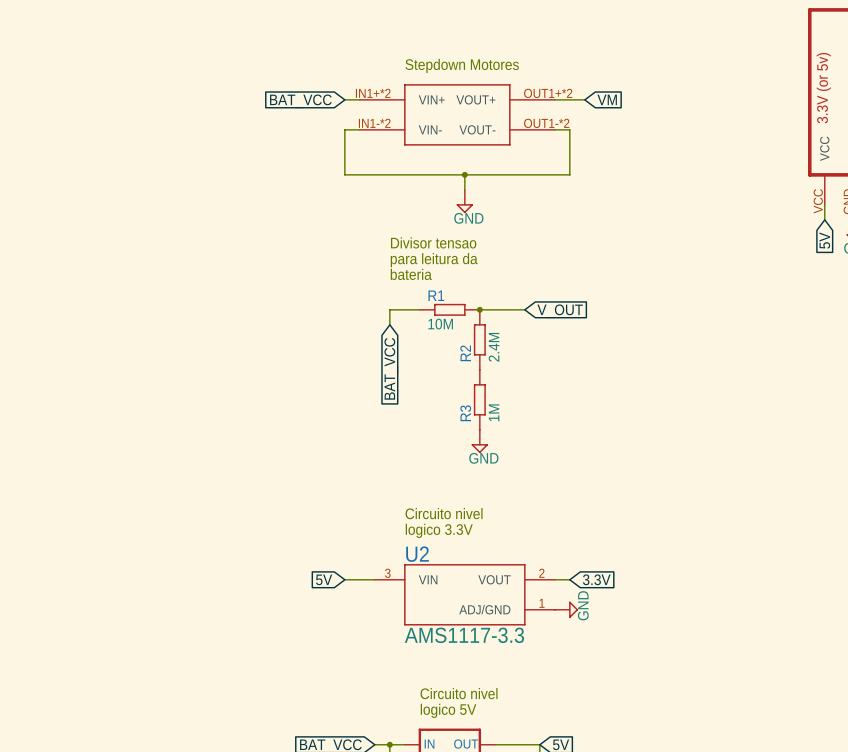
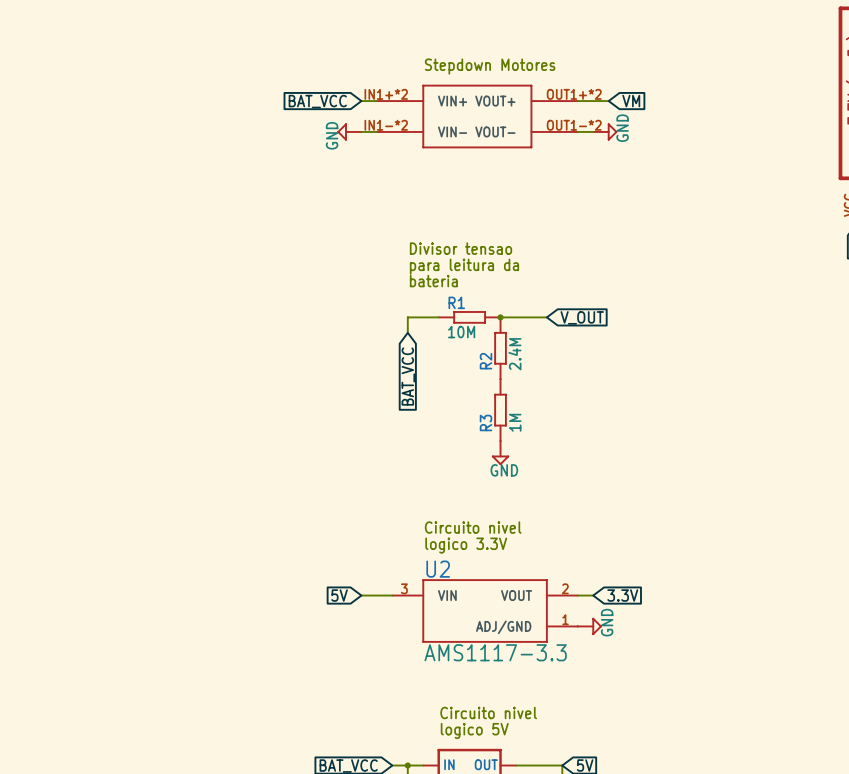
power symbol: none -> GND (349, 131)
wire: (344, 129) (344, 174) (569, 174) (569, 129) -> none
power symbol: none -> GND (605, 131)
wire: (464, 174) (464, 189) -> none
junction: (464, 174) -> none
power symbol: GND (464, 201) -> none

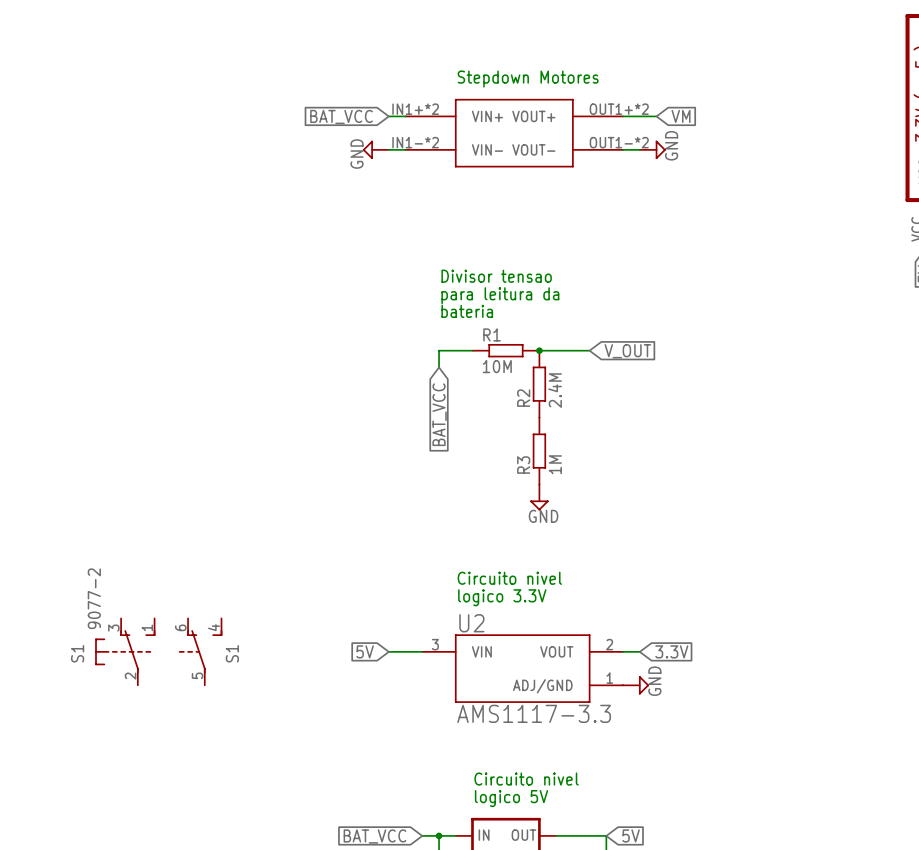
S1: none -> 9077-2 (125, 651)
S1: none -> (200, 651)

